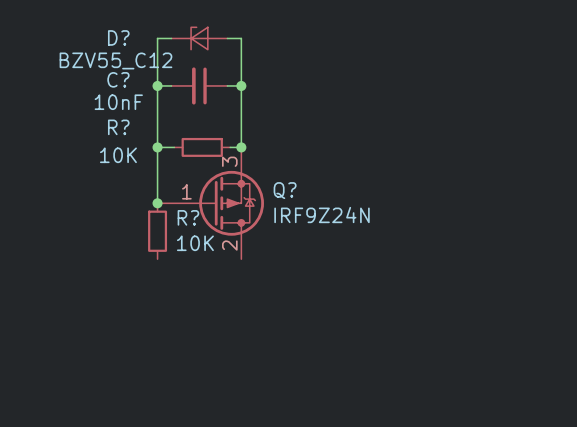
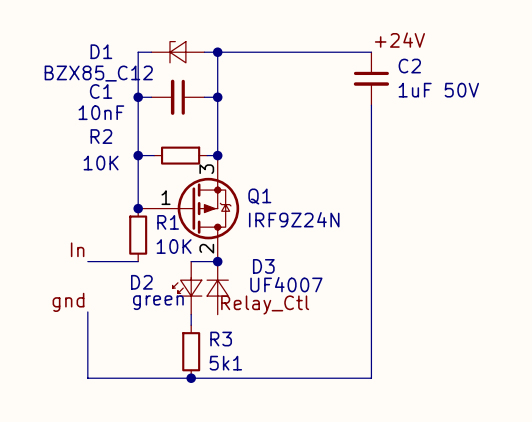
label: none -> +24V (399, 40)
D? name: D? (118, 37) -> D1 (101, 51)
wire: none -> (217, 52) (371, 52)
junction: none -> (217, 52)
D? value: BZV55_C12 (115, 60) -> BZX85_C12 (98, 73)
C2: none -> 1uF 50V (371, 78)
C? name: C? (118, 79) -> C1 (101, 91)
wire: none -> (371, 105) (371, 378) (87, 378) (87, 311)
R? name: R? (118, 127) -> R2 (101, 136)
Q? name: Q? (285, 190) -> Q1 (259, 196)
R? name: R? (188, 217) -> R1 (168, 222)
label: none -> In (77, 249)
wire: none -> (87, 261) (138, 261)
wire: none -> (191, 261) (217, 261)
junction: none -> (217, 261)
D2: none -> green (187, 288)
D3: none -> UF4007 (217, 288)
label: none -> gnd (68, 302)
label: none -> Relay_Ctl (265, 305)
wire: none -> (191, 314) (191, 325)
R3: none -> 5k1 (191, 351)
junction: none -> (191, 378)

